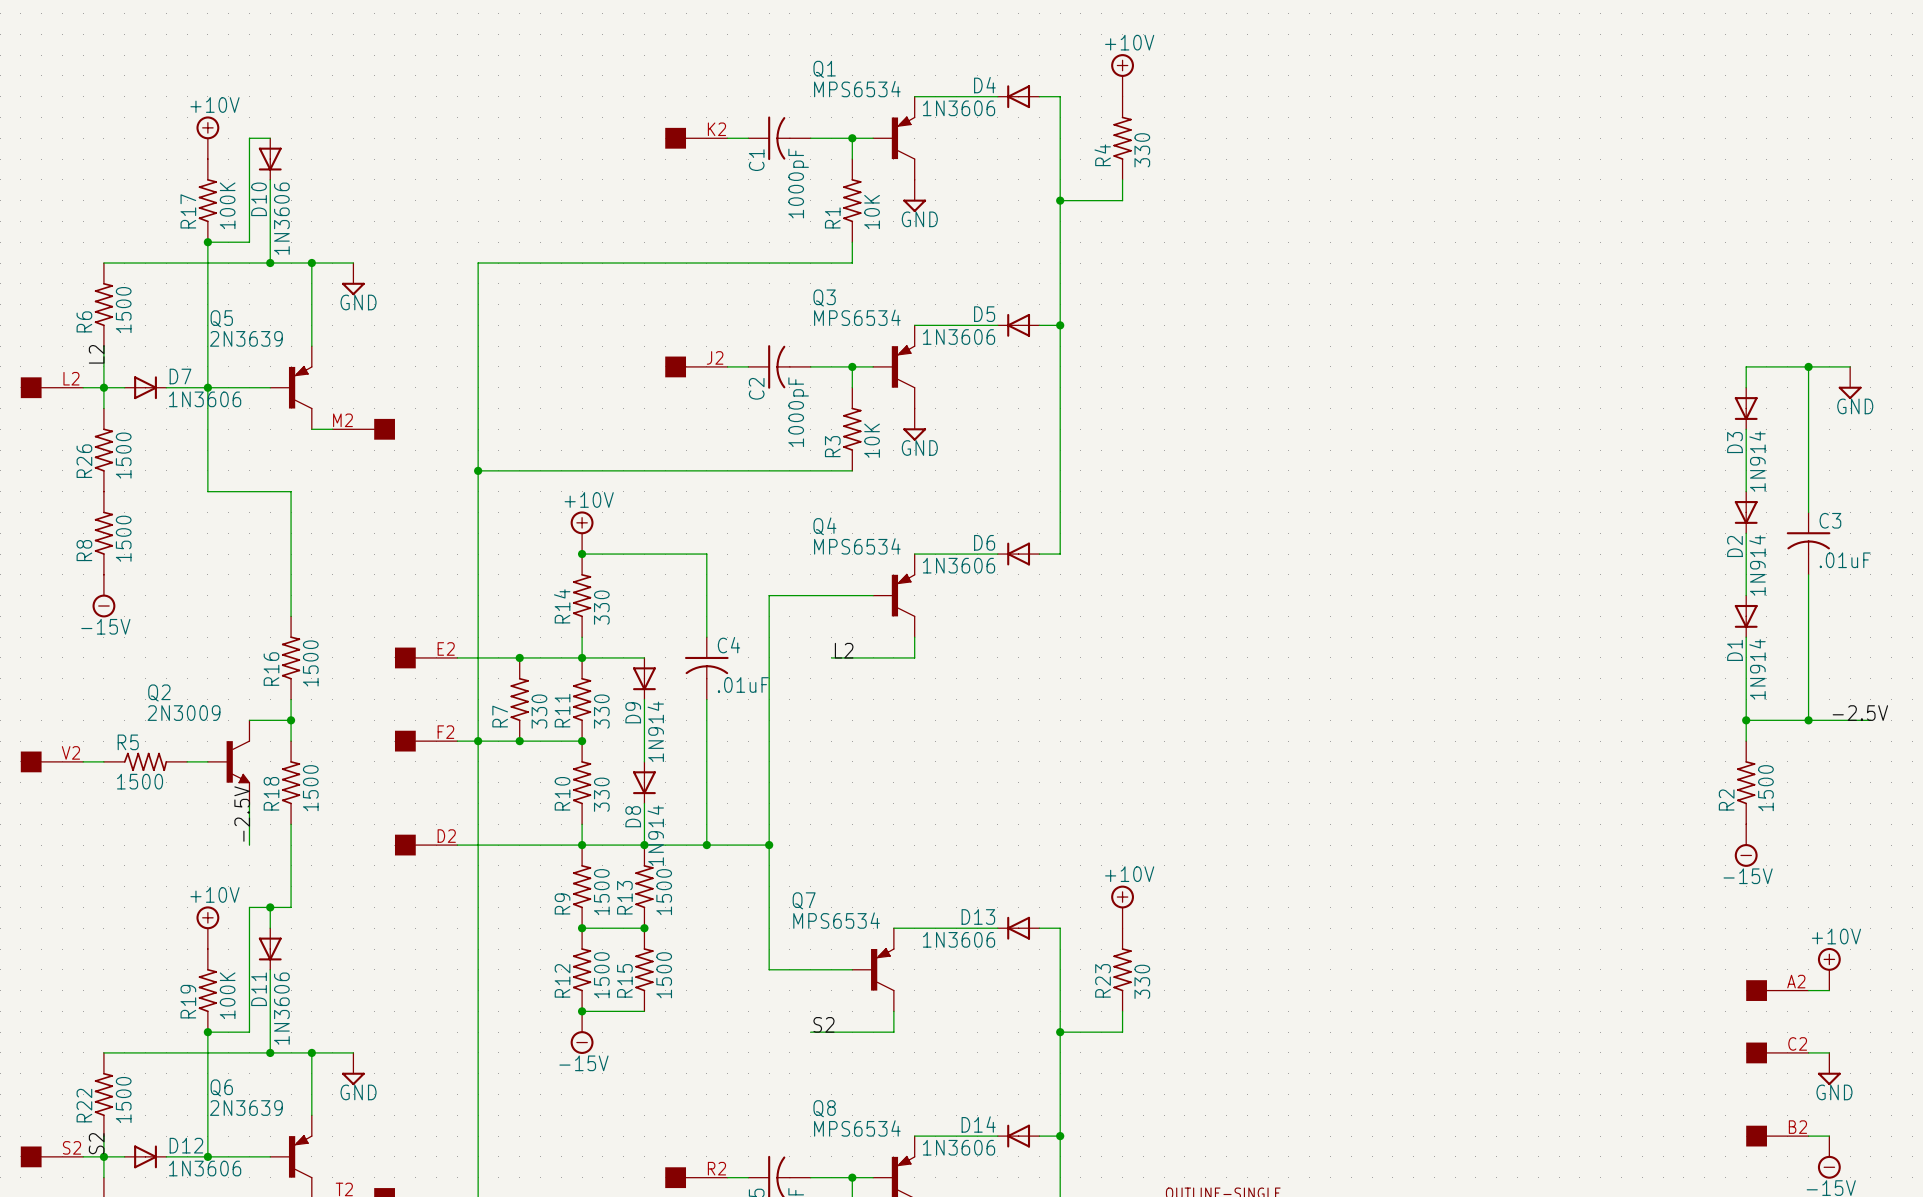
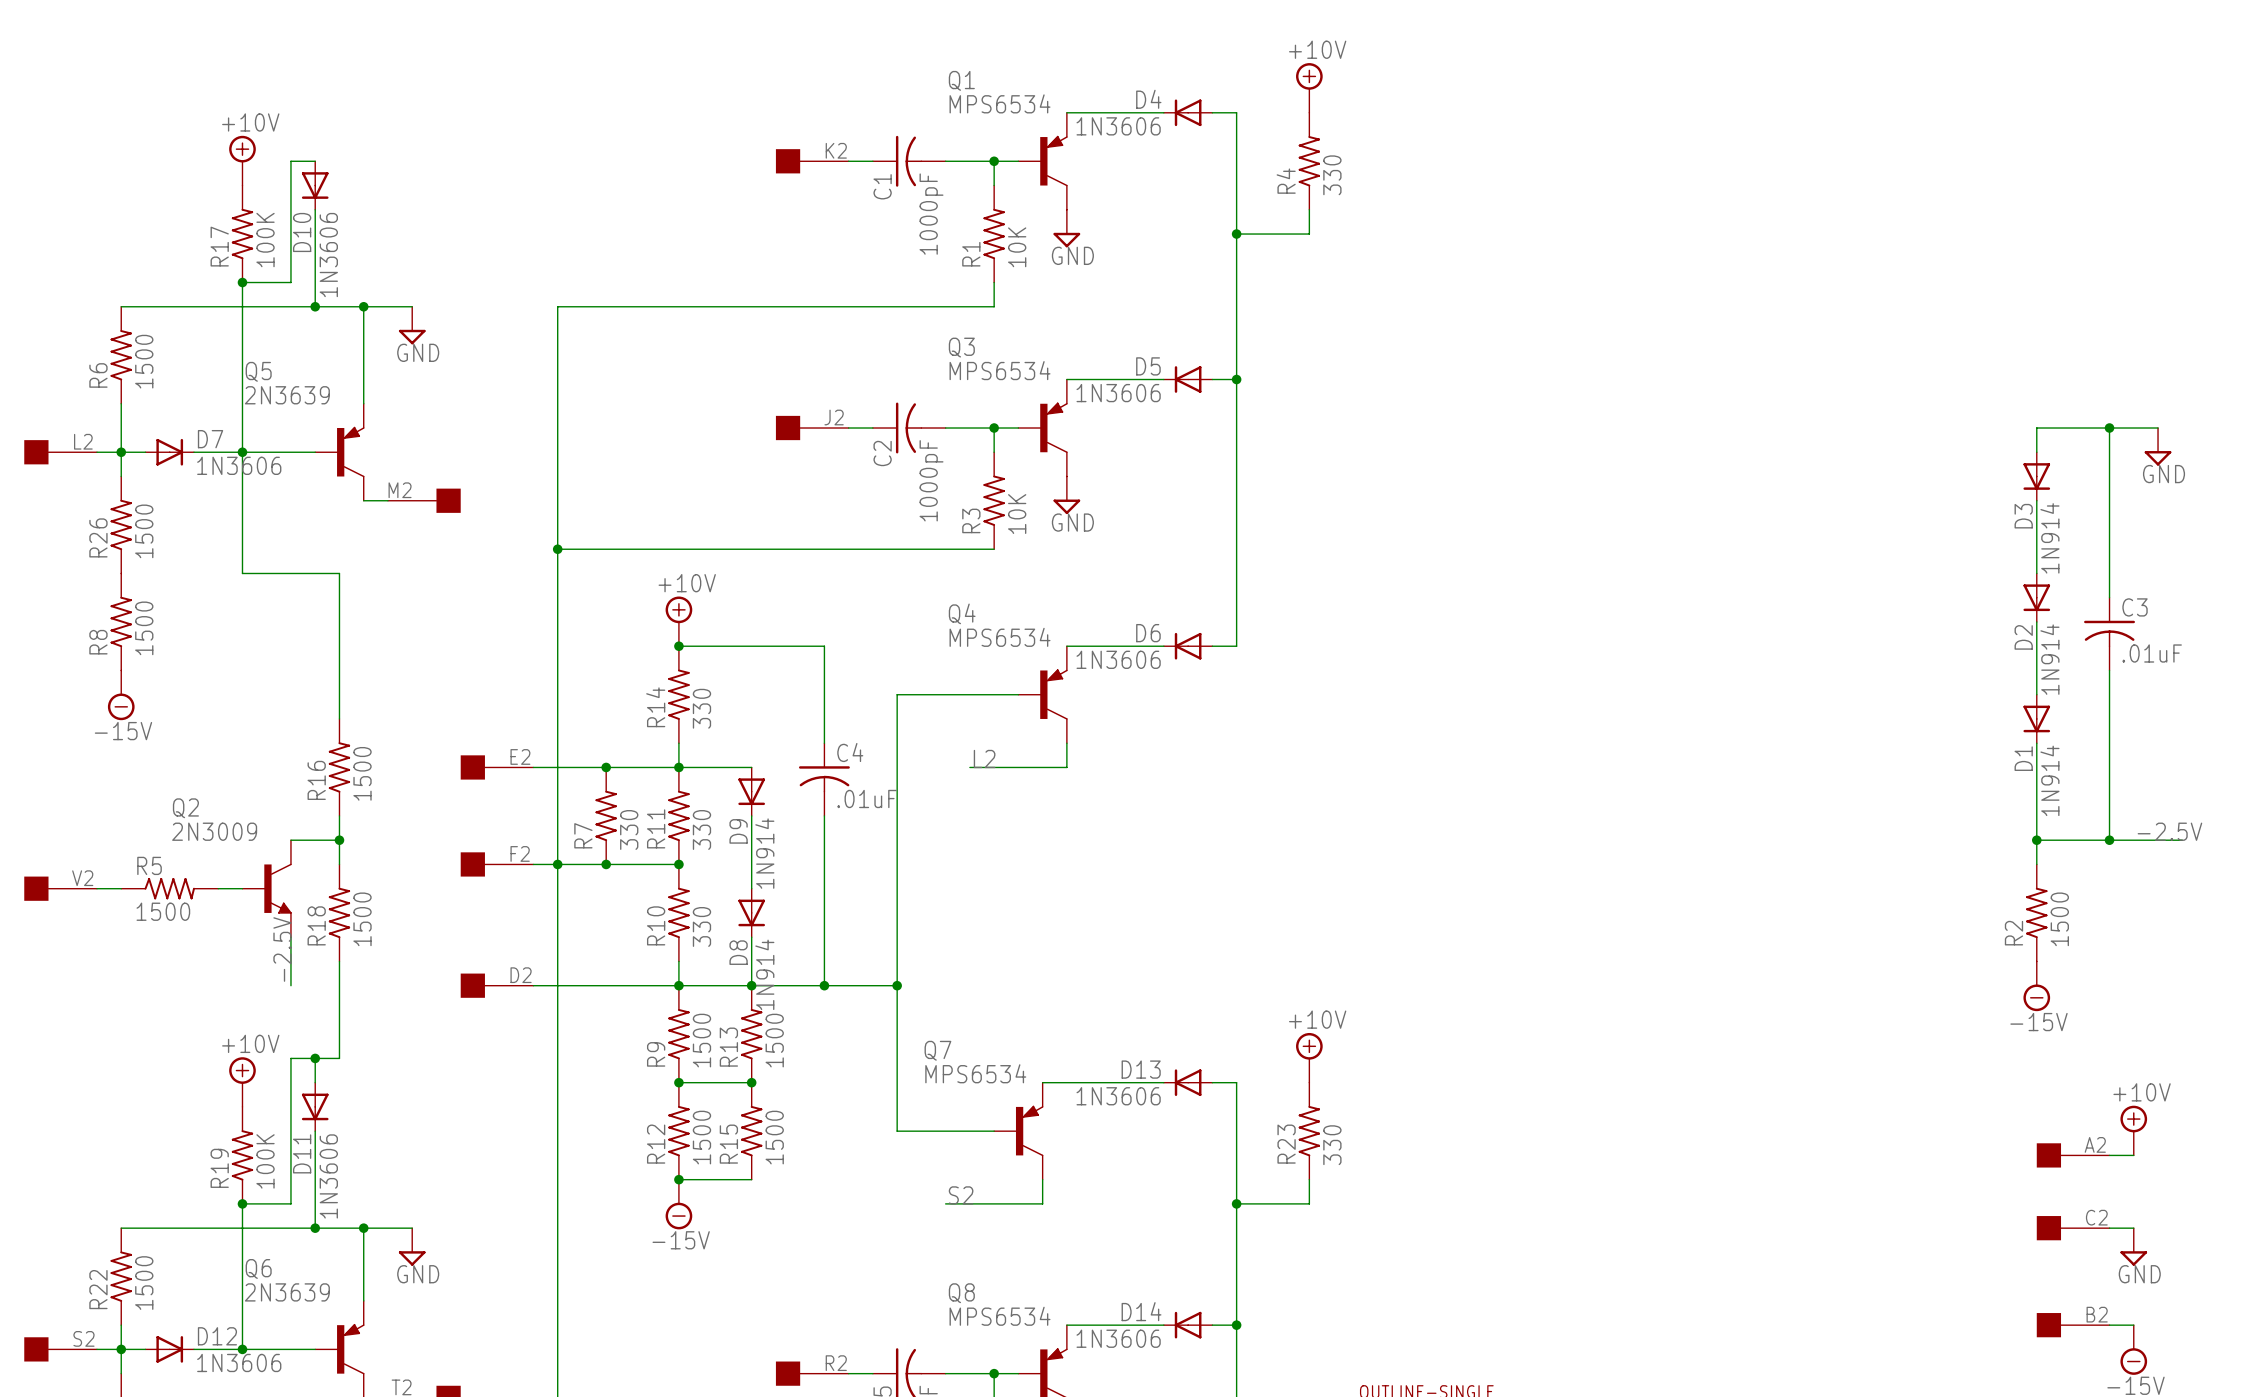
label: L2 (96, 354) -> none
label: S2 (96, 1143) -> none

